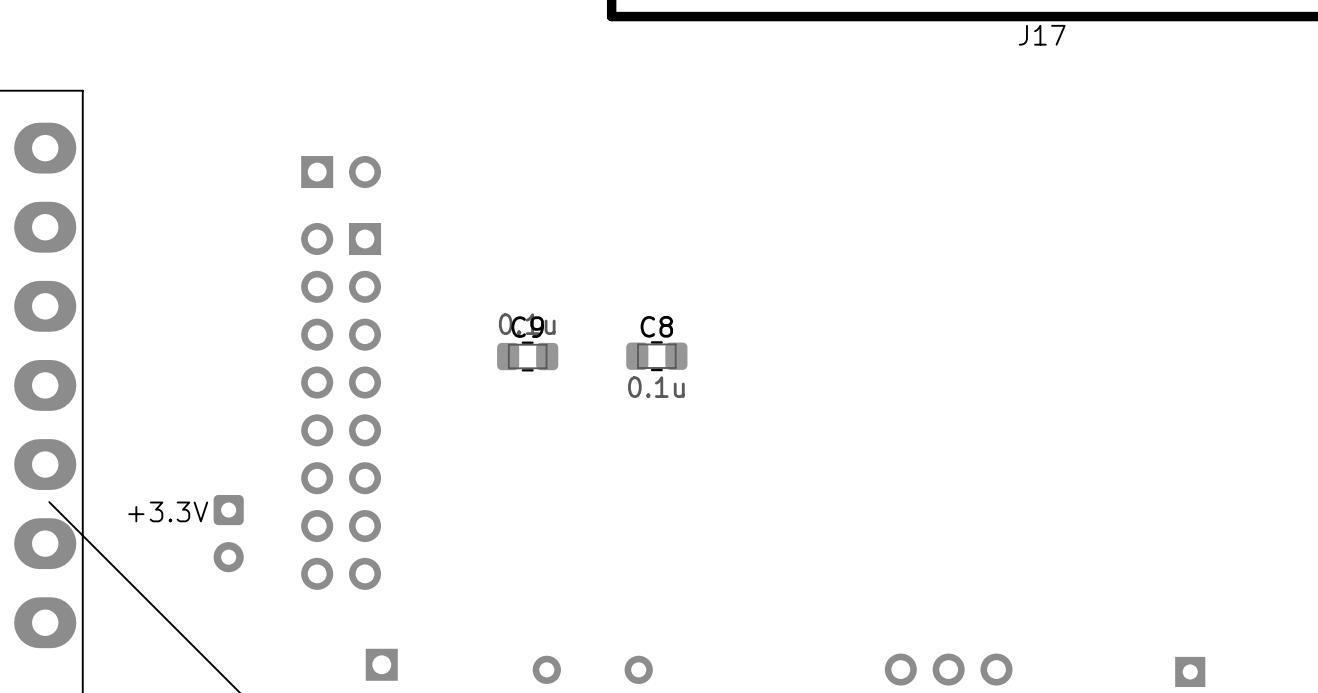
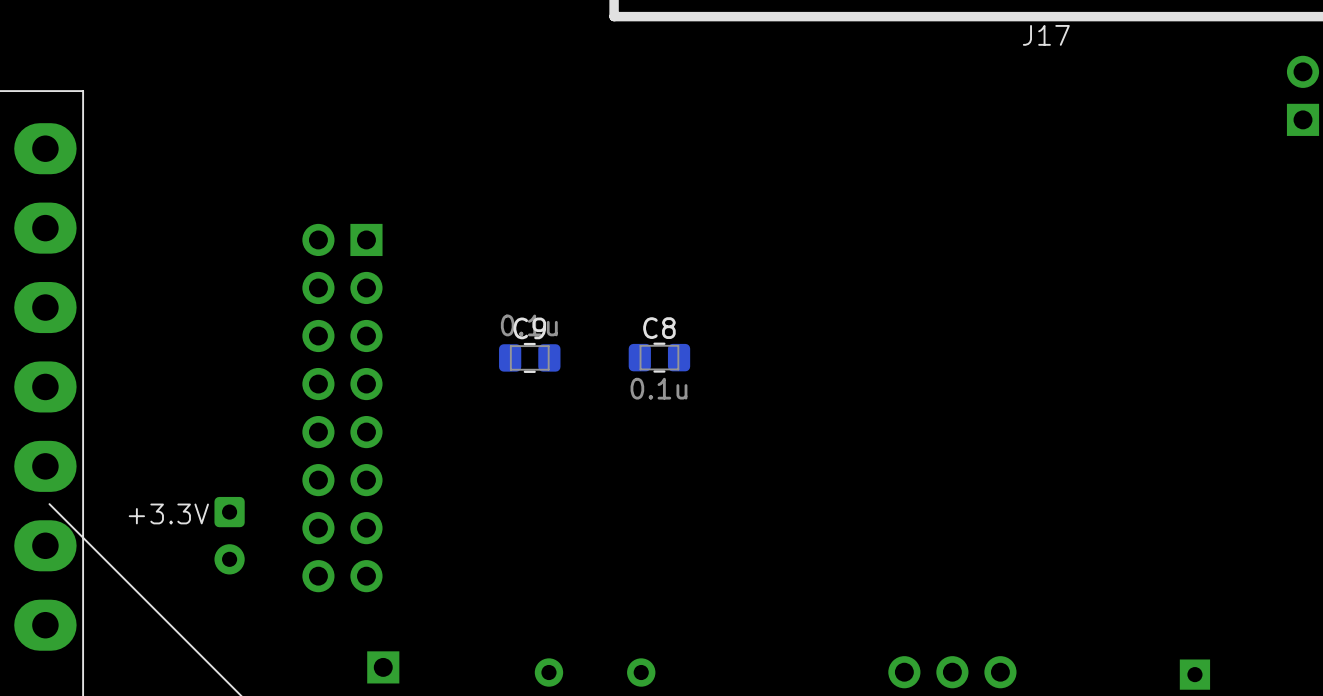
part: none -> (1303, 95)
part: (341, 172) -> none

